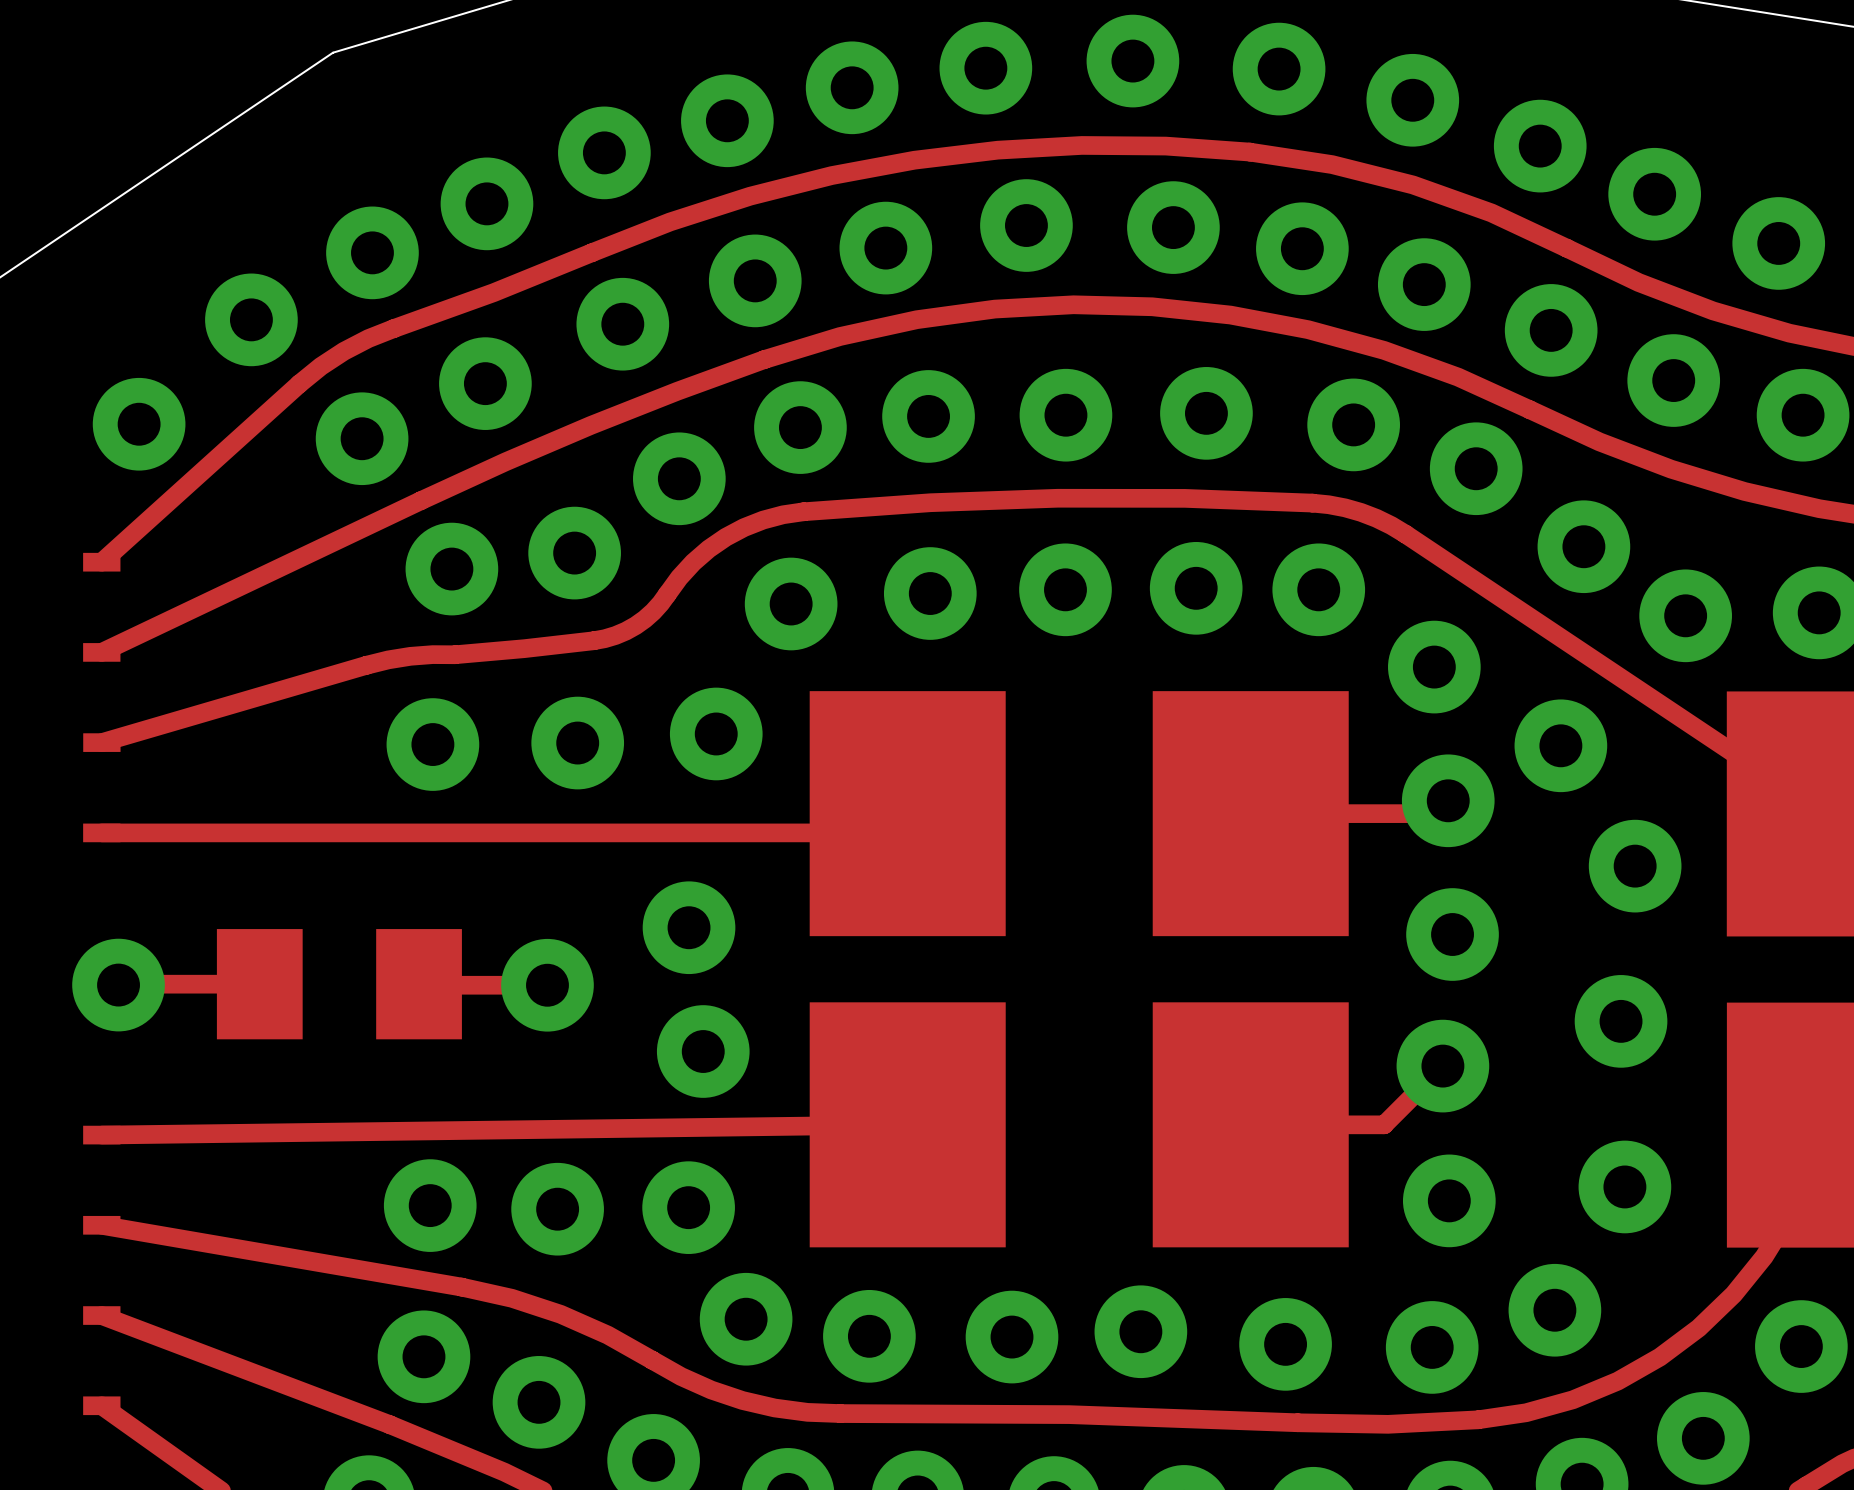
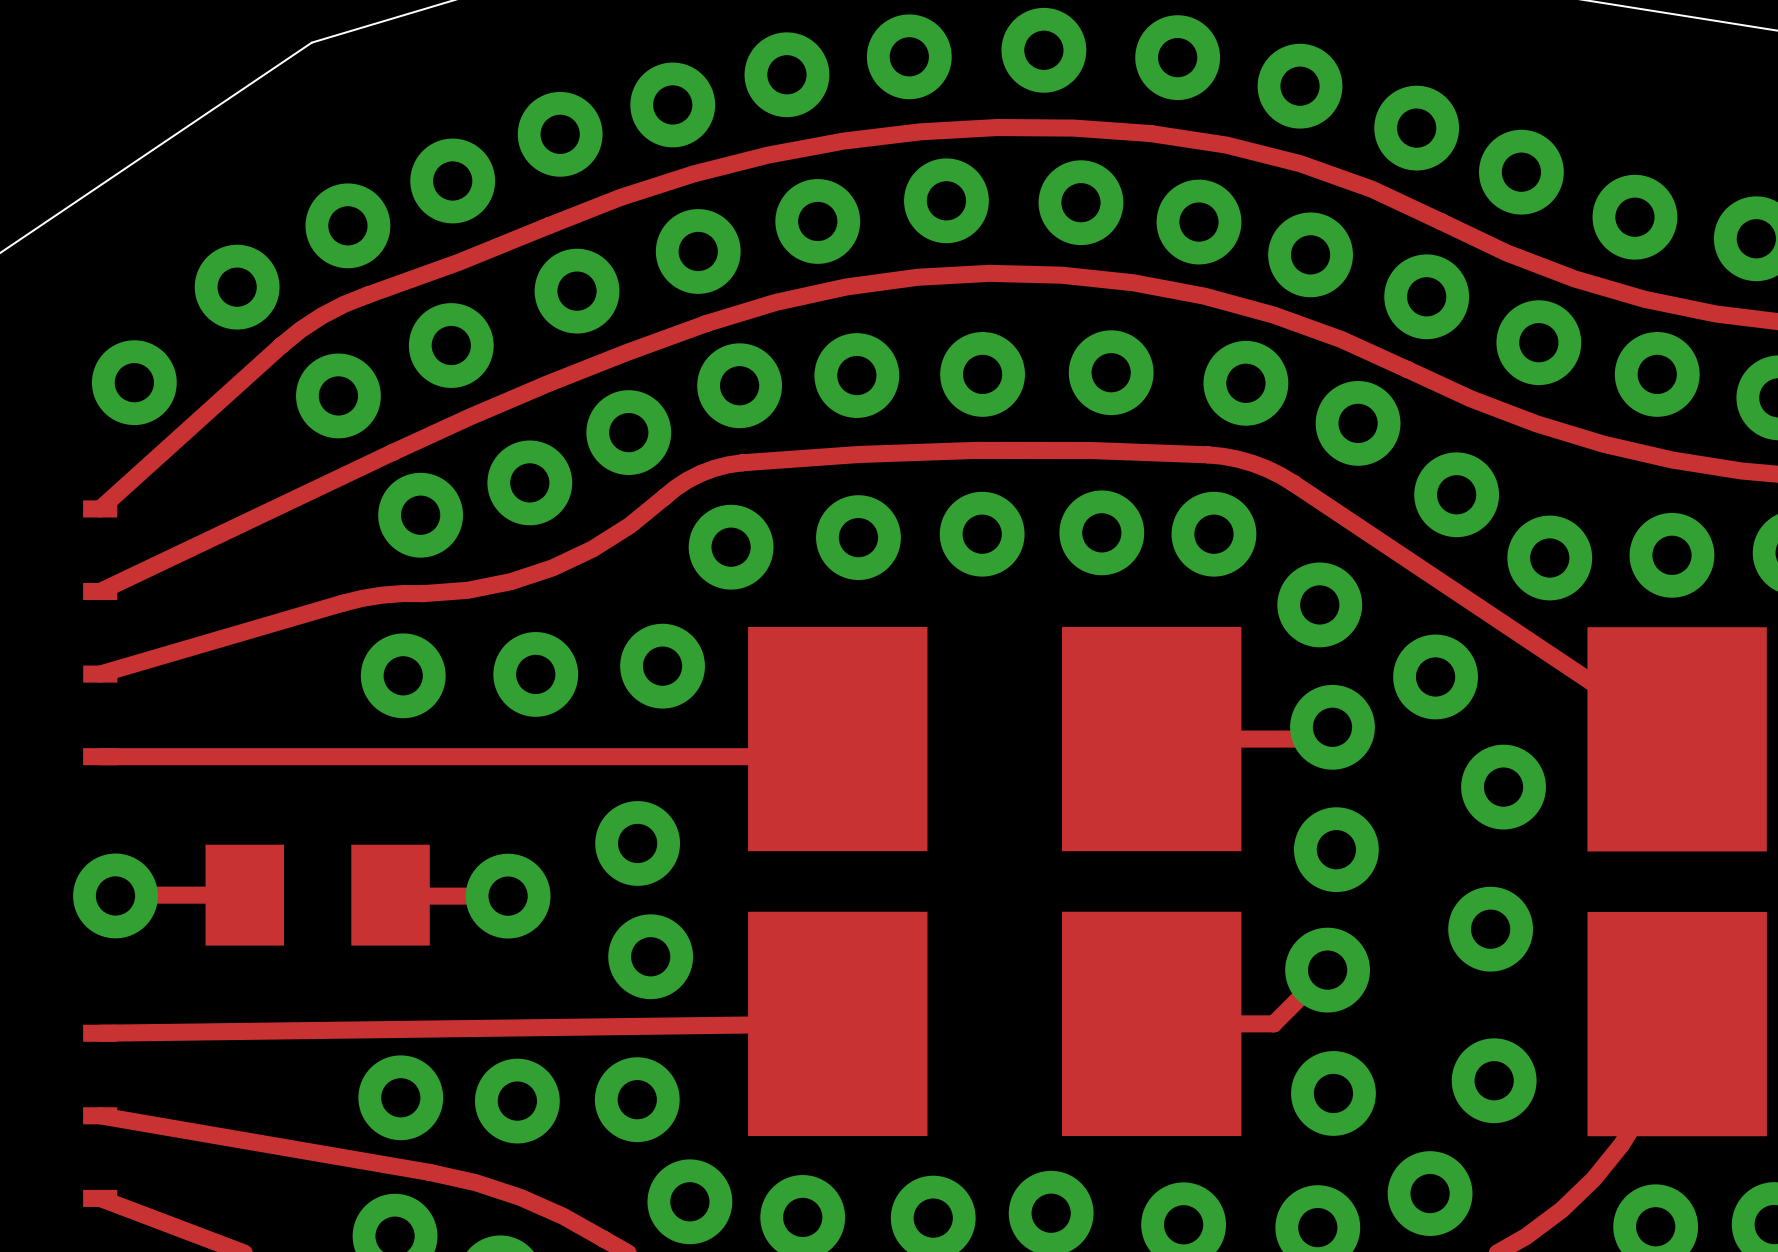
top track: (803, 511) (763, 520) (725, 537) (693, 562) (653, 611) (635, 625) (615, 635) (593, 640) (455, 654) -> (742, 462) (713, 468) (687, 480) (629, 525) (592, 549) (552, 567) (510, 581) (467, 590) (423, 593)
via position: (574, 553) -> (529, 482)

